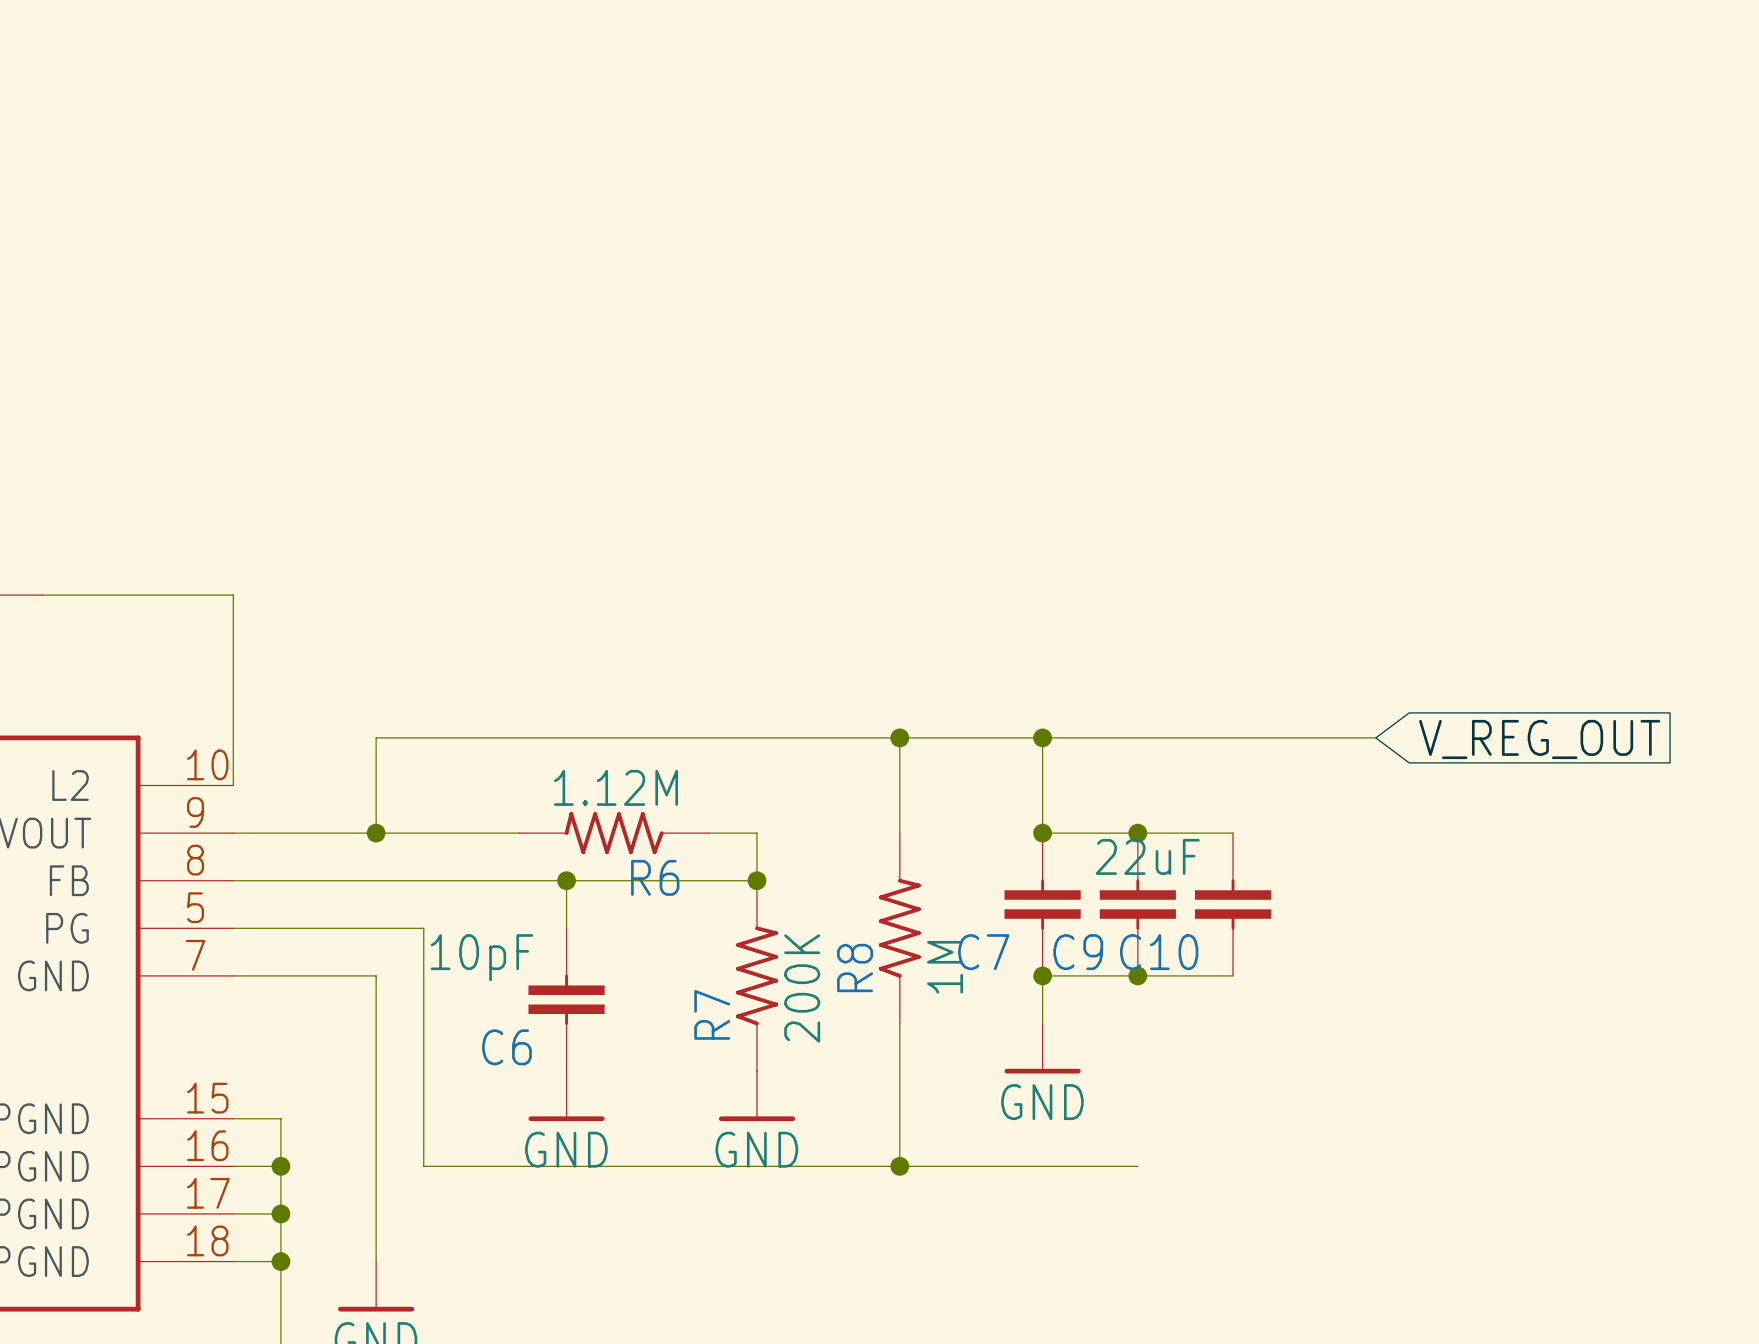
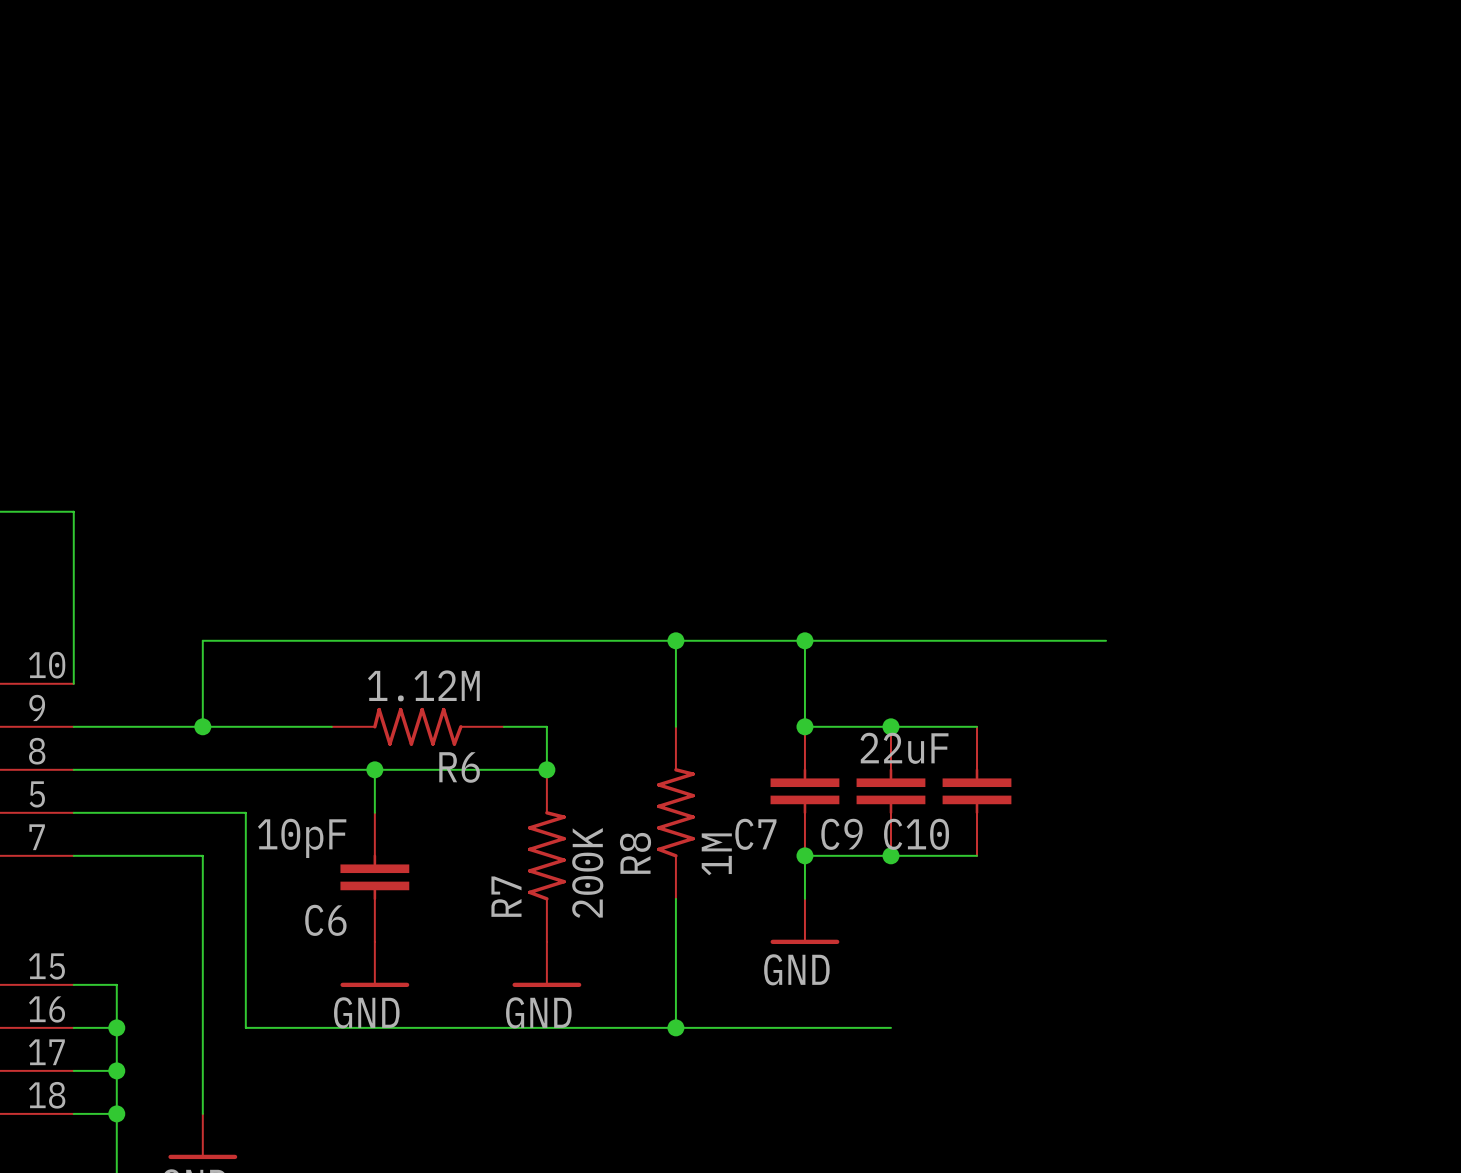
global label: V_REG_OUT (1539, 739) -> none

